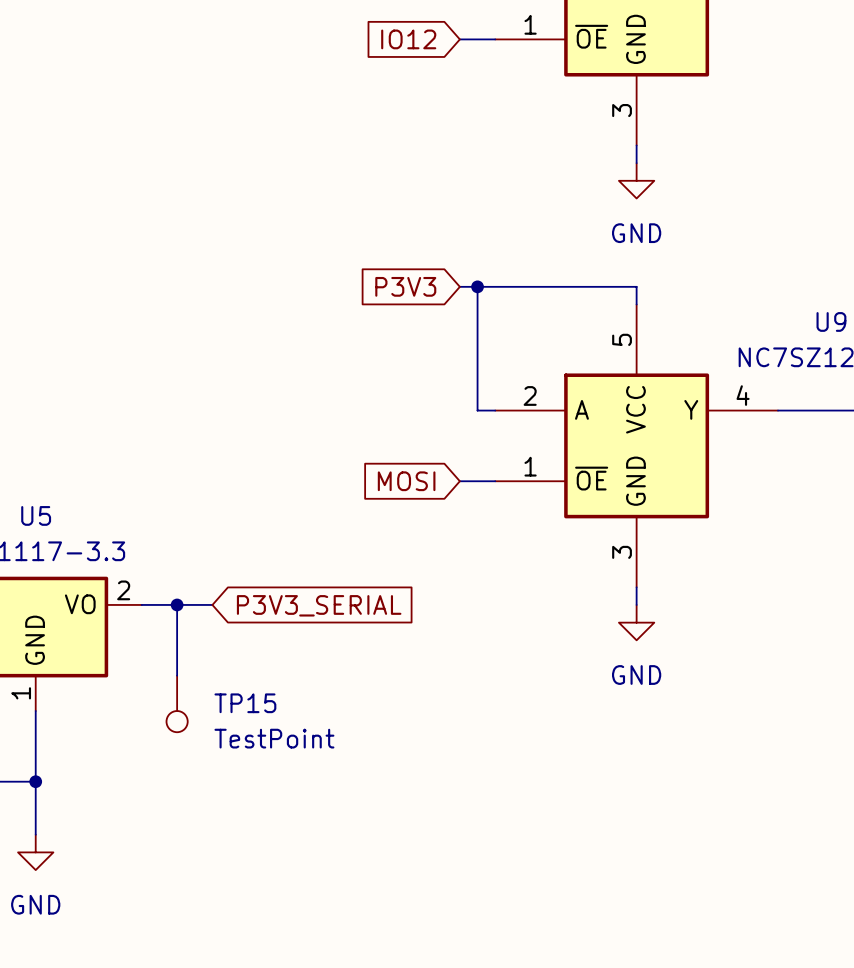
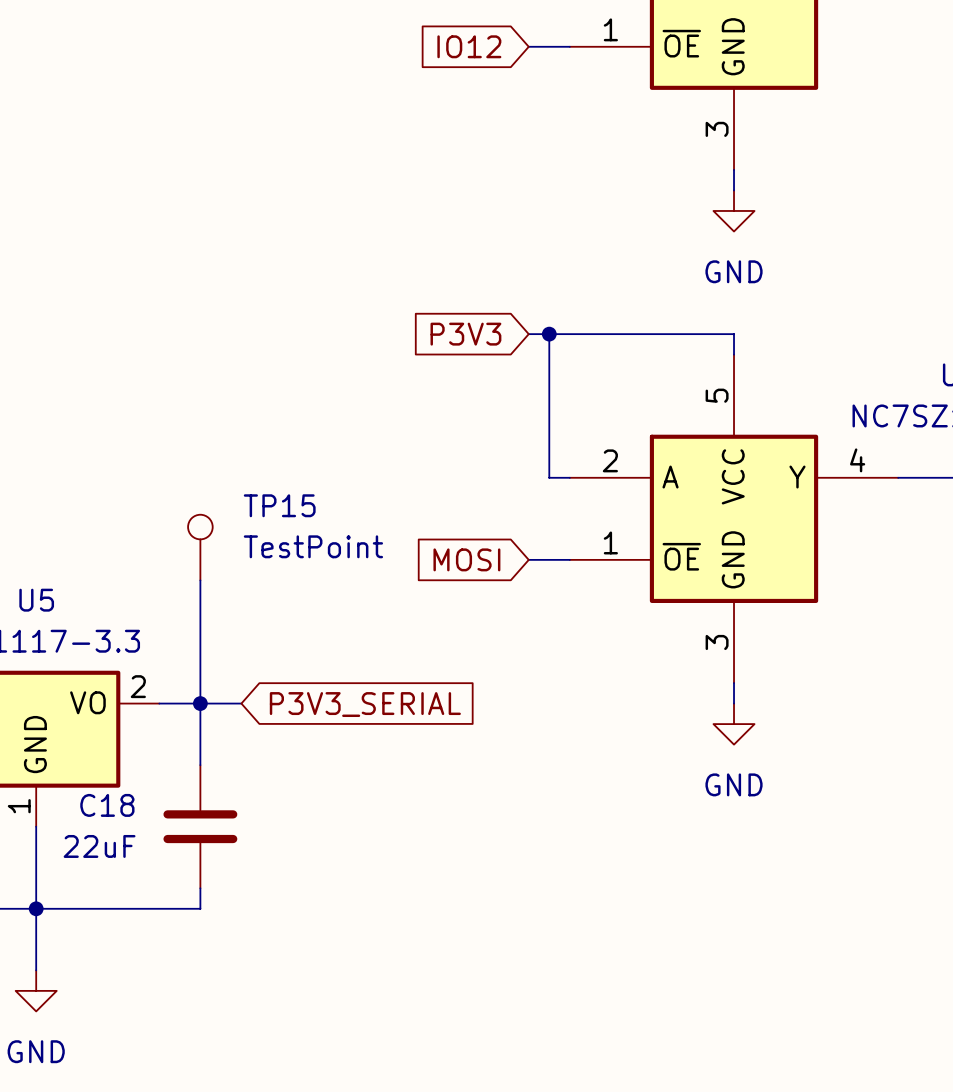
wire: none -> (200, 580) (200, 703)
TP15 position: (177, 703) -> (200, 547)
TP15 name position: TP15 (245, 703) -> TP15 (279, 505)
C18: none -> 22uF (200, 826)
TP15 rotation: 0° (177, 721) -> 180° (200, 527)
TP15 value position: TestPoint (274, 738) -> TestPoint (313, 546)
wire: none -> (200, 888) (200, 908) (36, 908)

